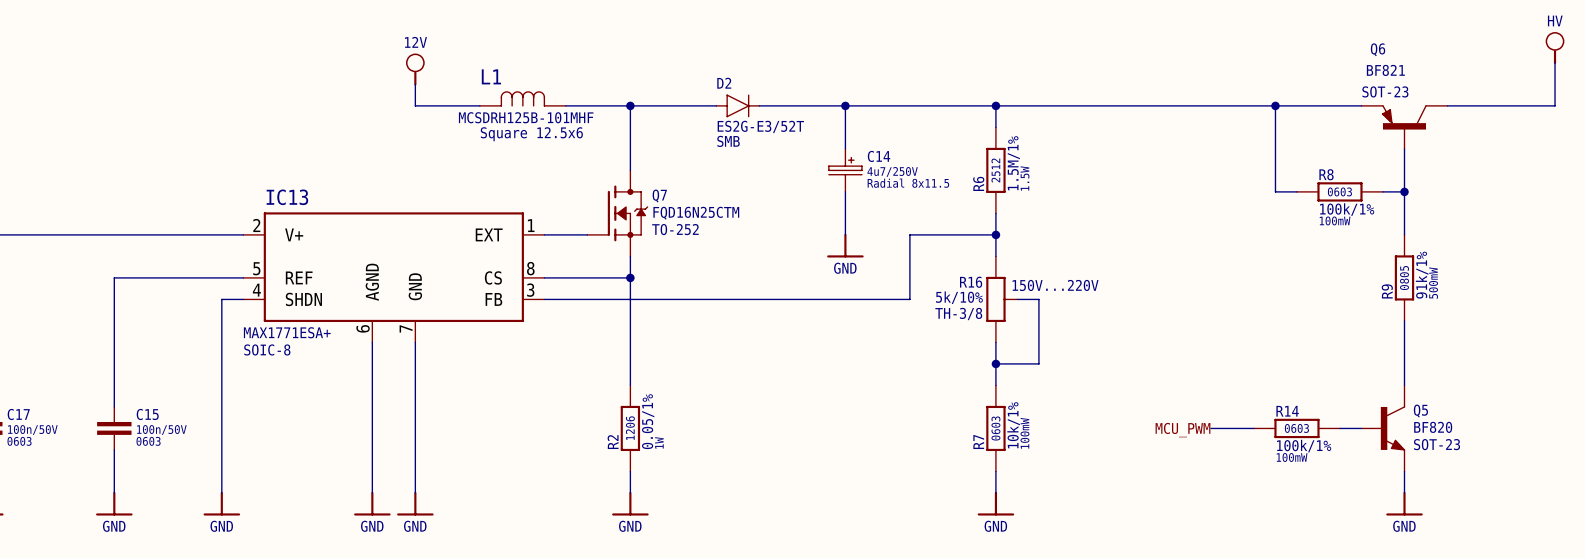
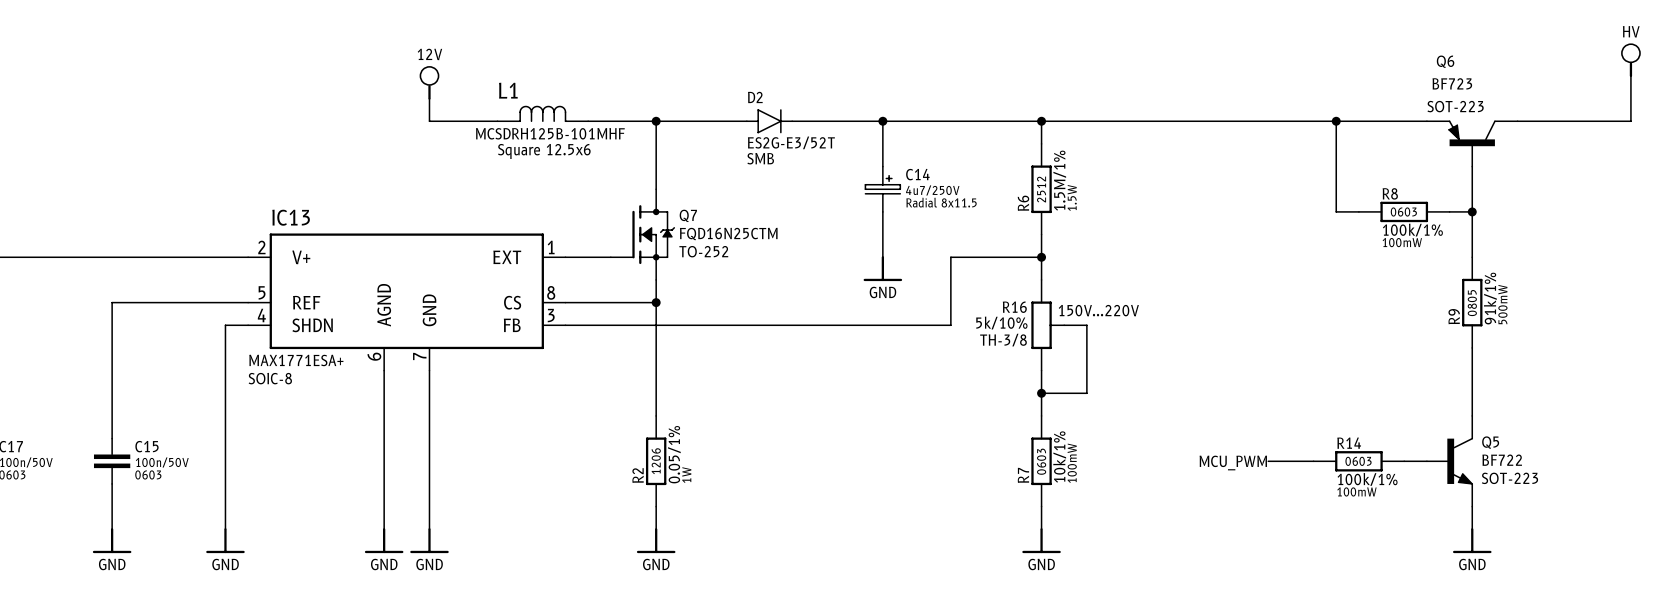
Q6 value: BF821 (1385, 70) -> BF723 (1452, 83)
Q6 text: SOT-23 (1385, 91) -> SOT-223 (1455, 106)
Q5 value: BF820 (1433, 427) -> BF722 (1502, 460)
Q5 text: SOT-23 (1437, 444) -> SOT-223 (1509, 478)

